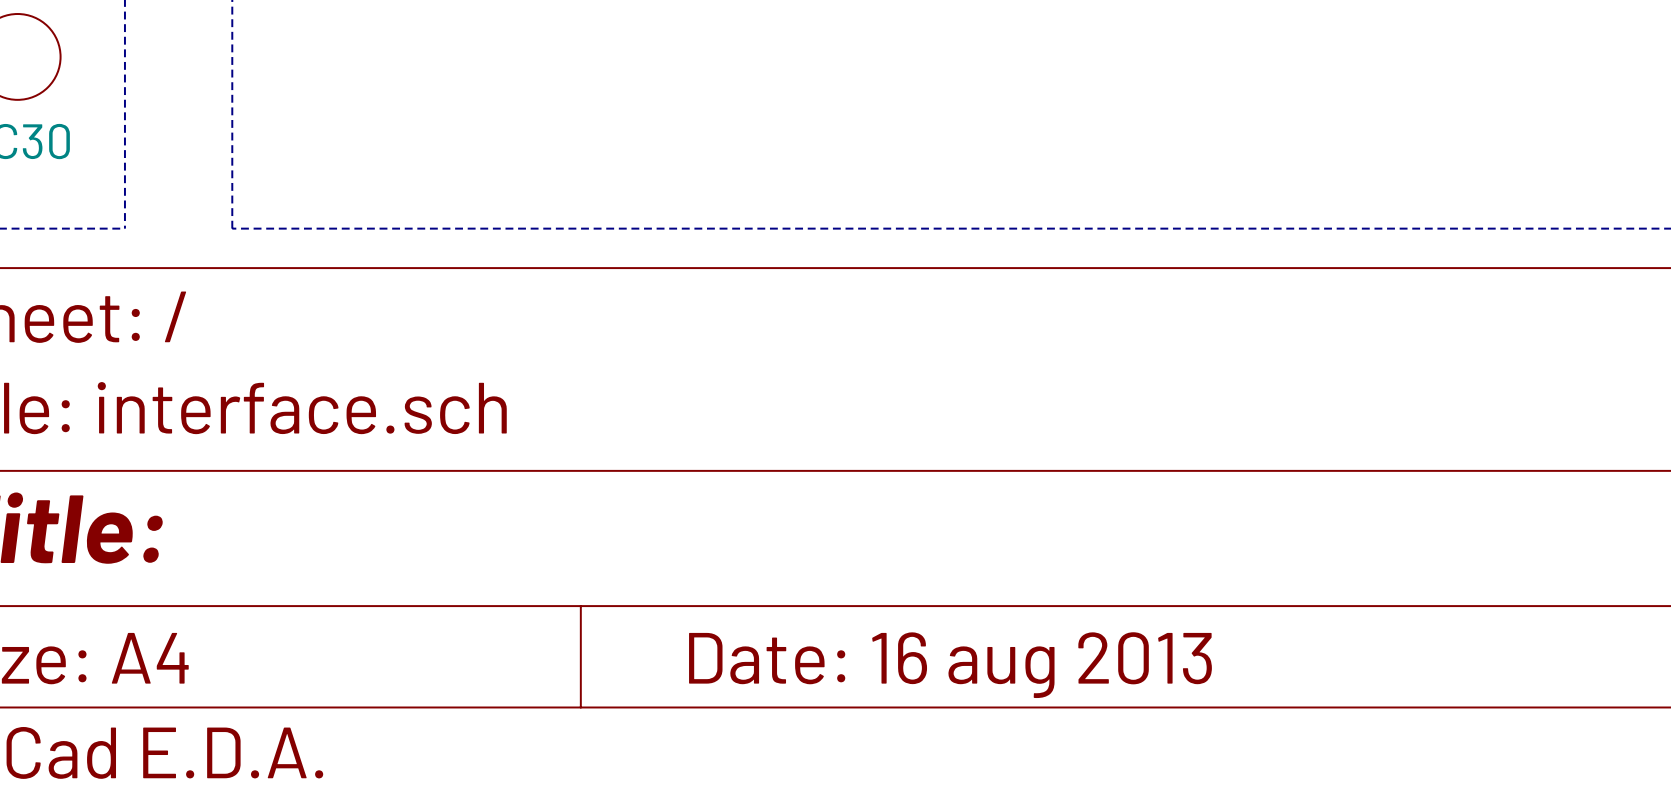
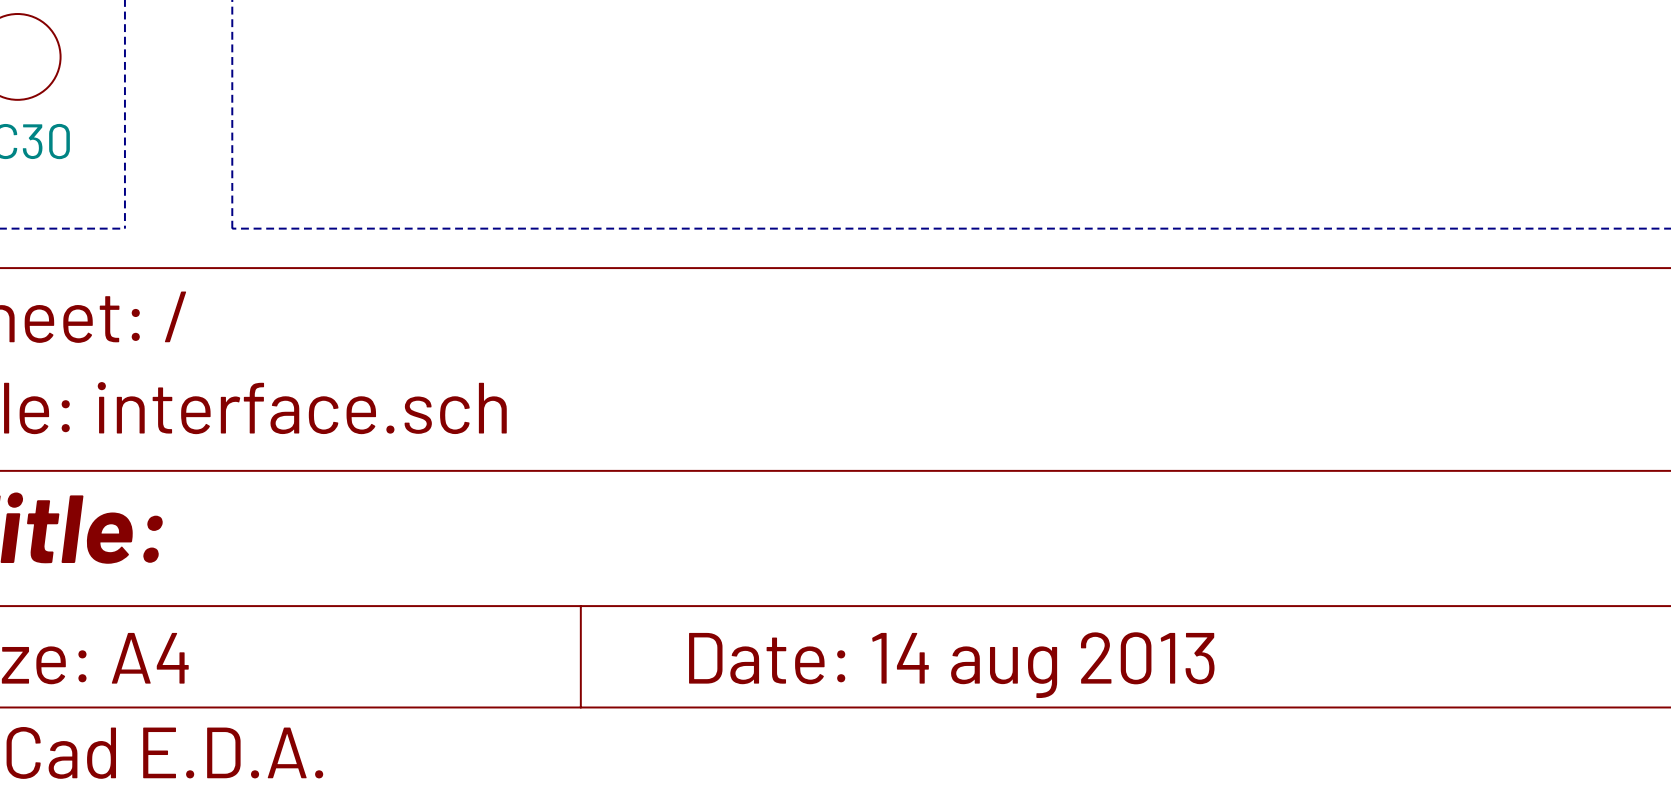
title block: Date: 16 aug 2013 (950, 665) -> Date: 14 aug 2013 (951, 665)

